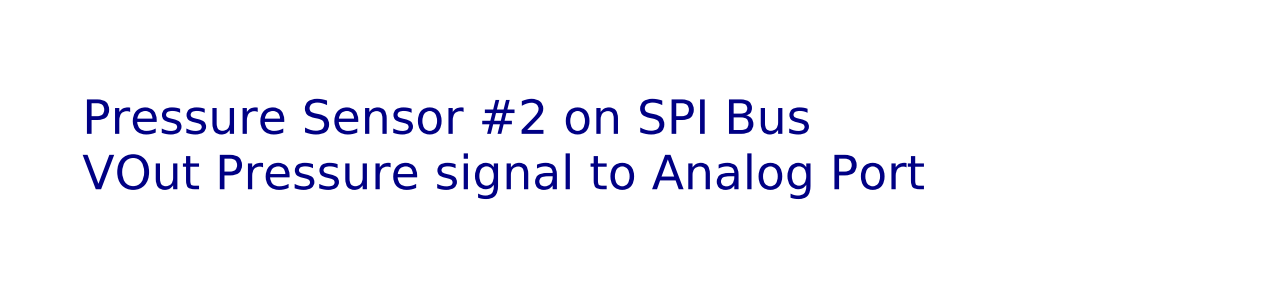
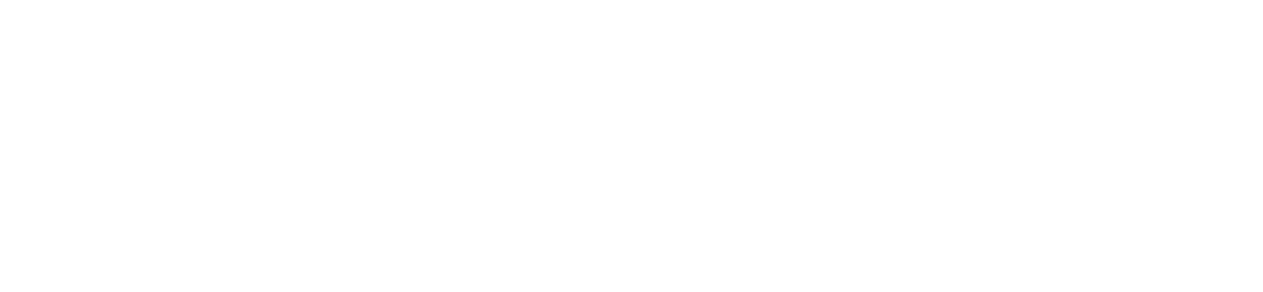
text: Pressure Sensor #2 on SPI Bus (447, 116) -> none
text: VOut Pressure signal to Analog Port (503, 176) -> none

